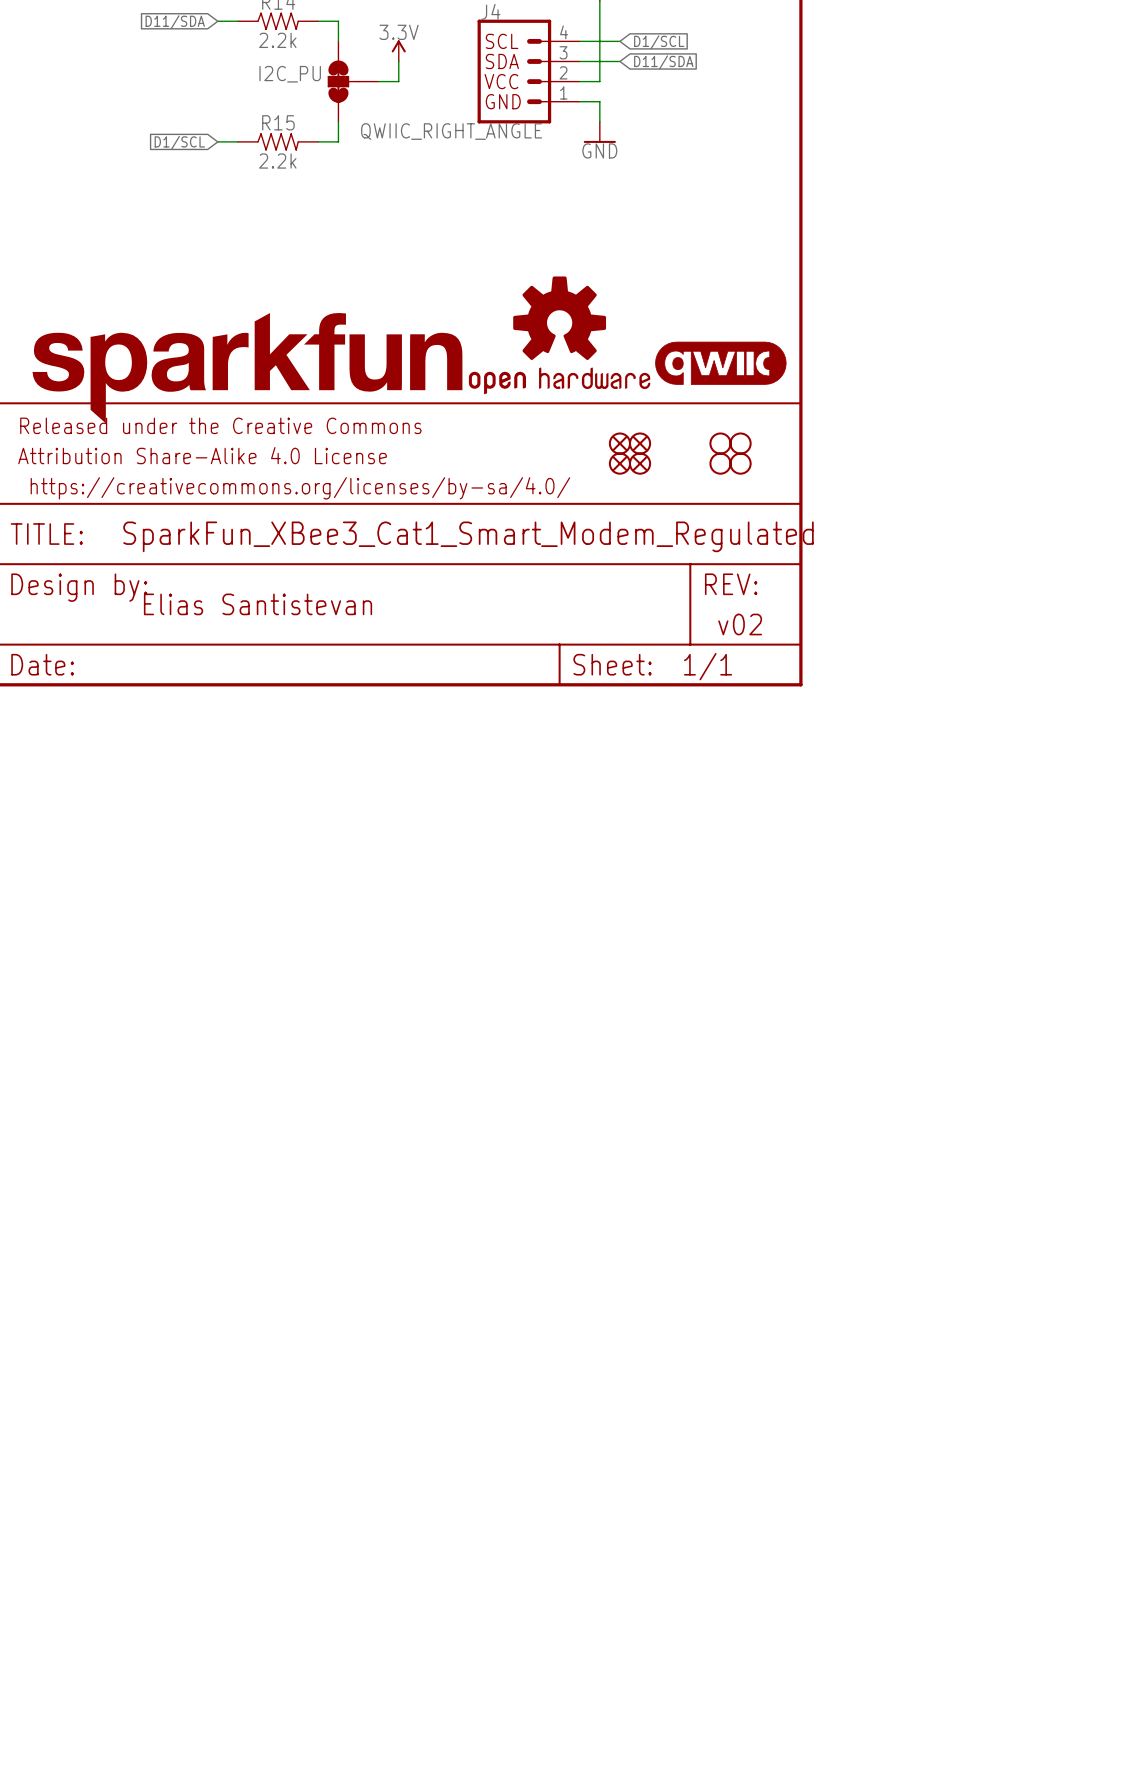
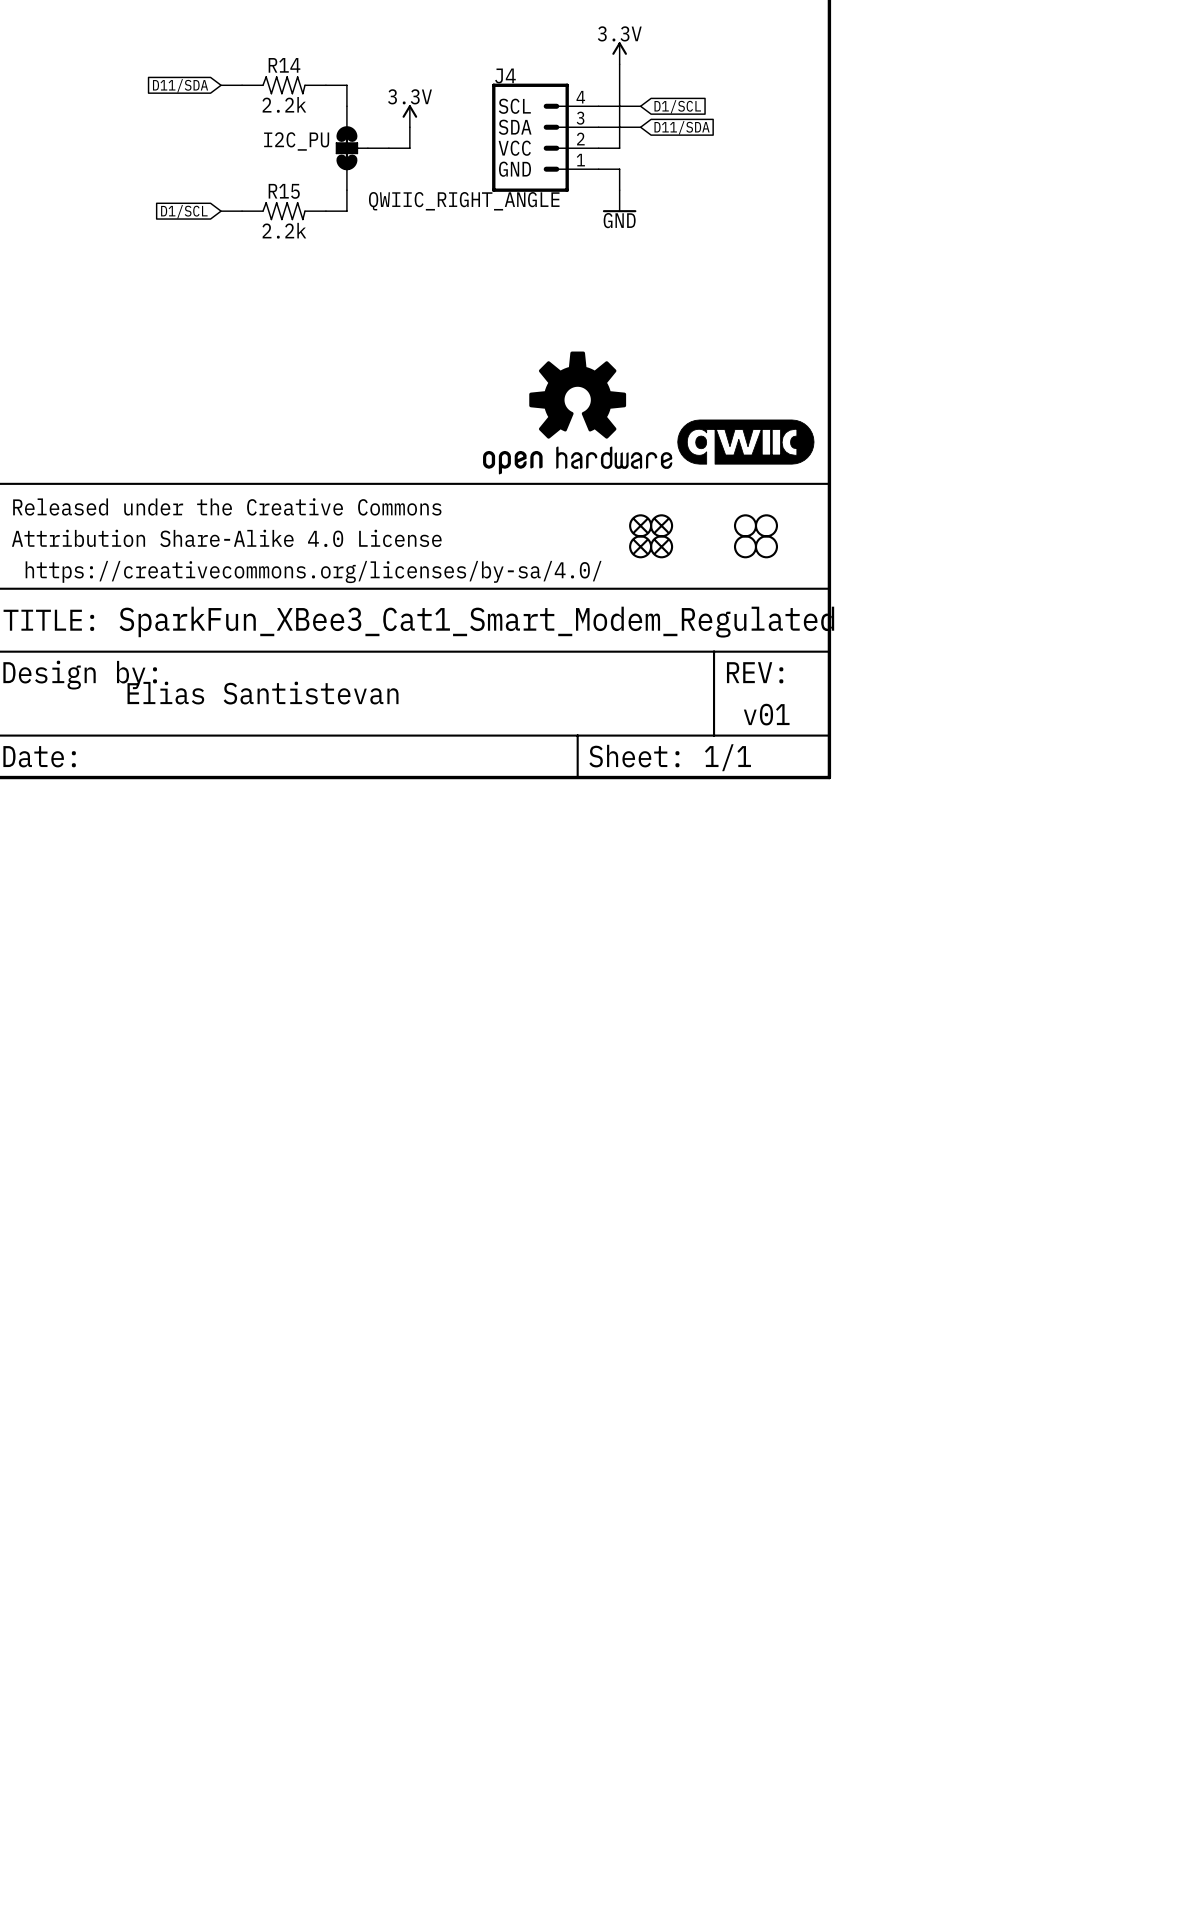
part: (247, 368) -> none
text: v02 (740, 624) -> v01 (766, 714)

